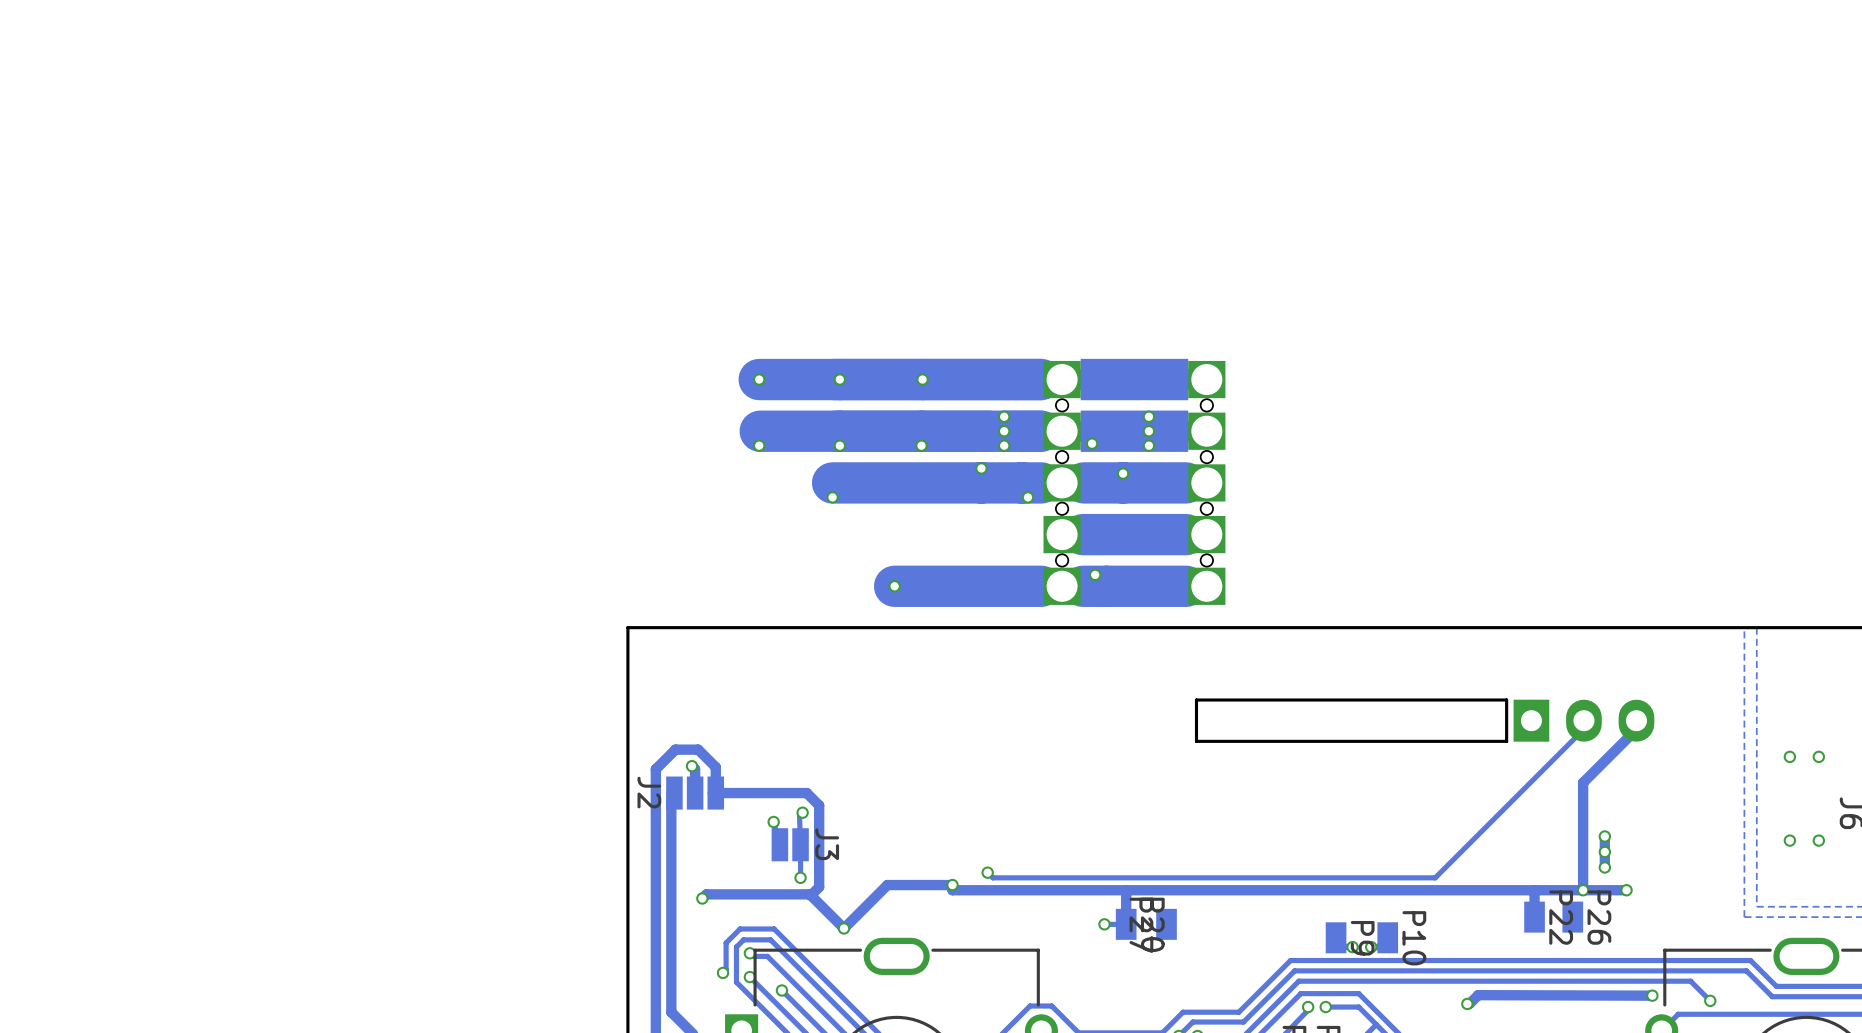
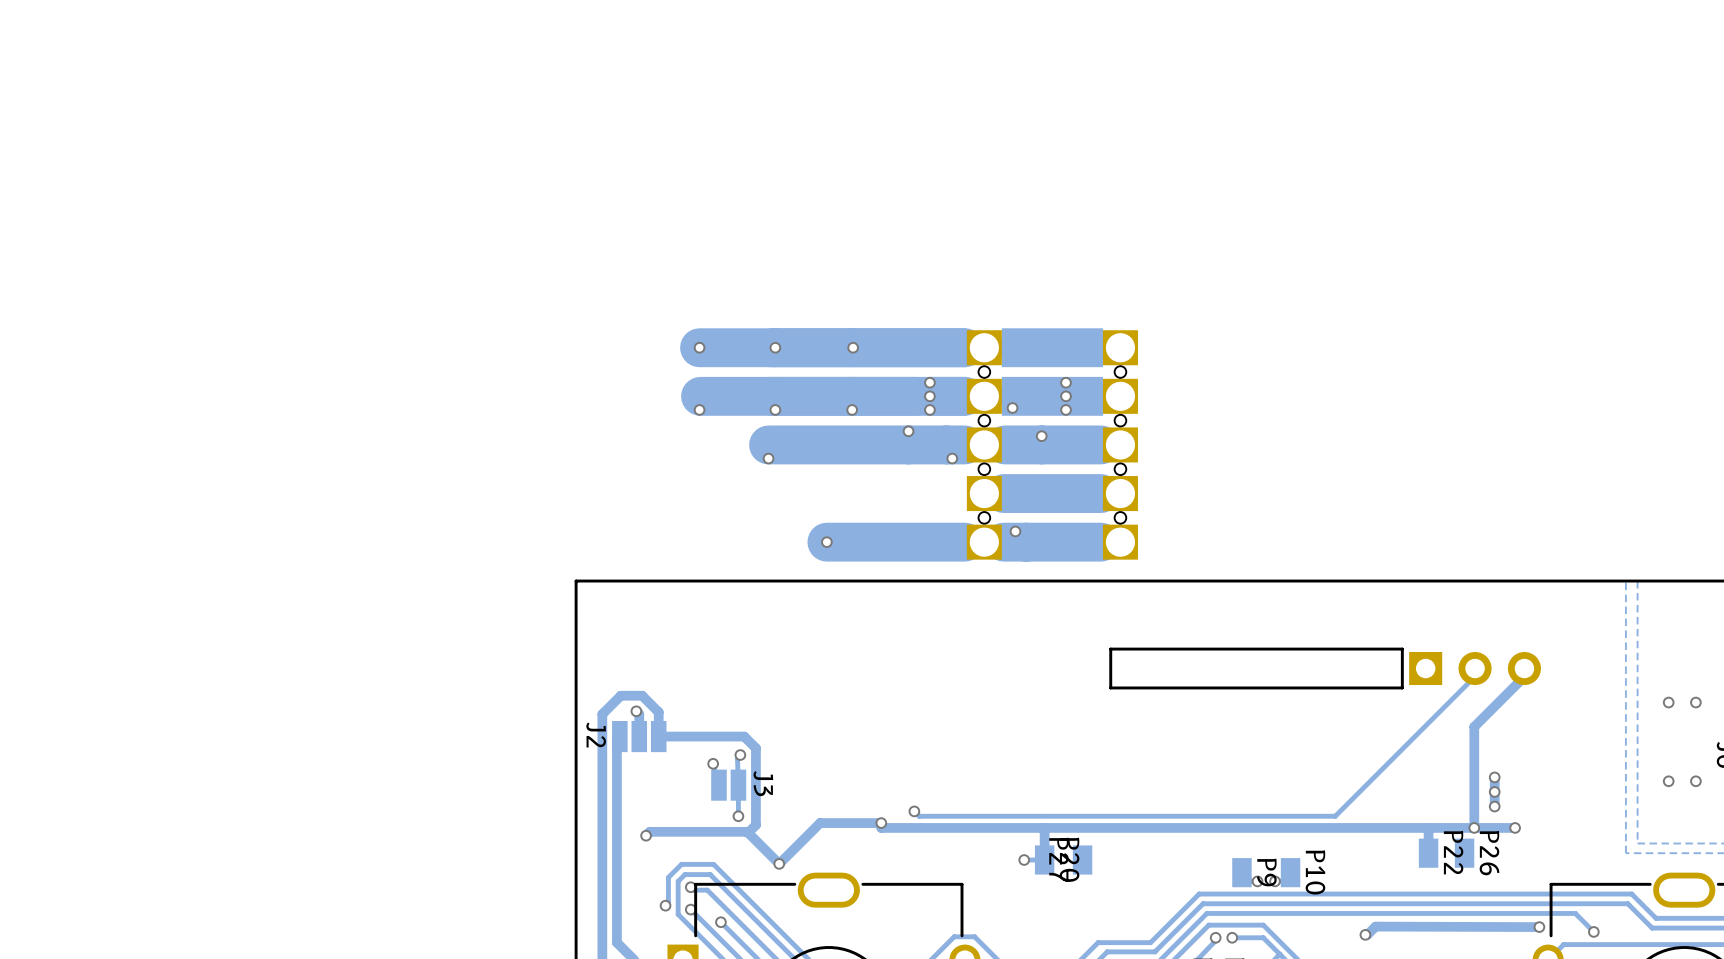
part footprint: [1513, 699, 1655, 742] -> [1409, 651, 1541, 686]

